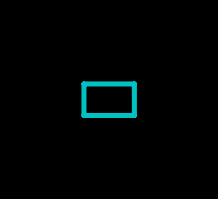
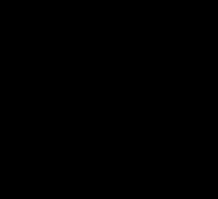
line: (83, 83) (83, 115) (134, 115) (134, 83) (83, 83) -> none

